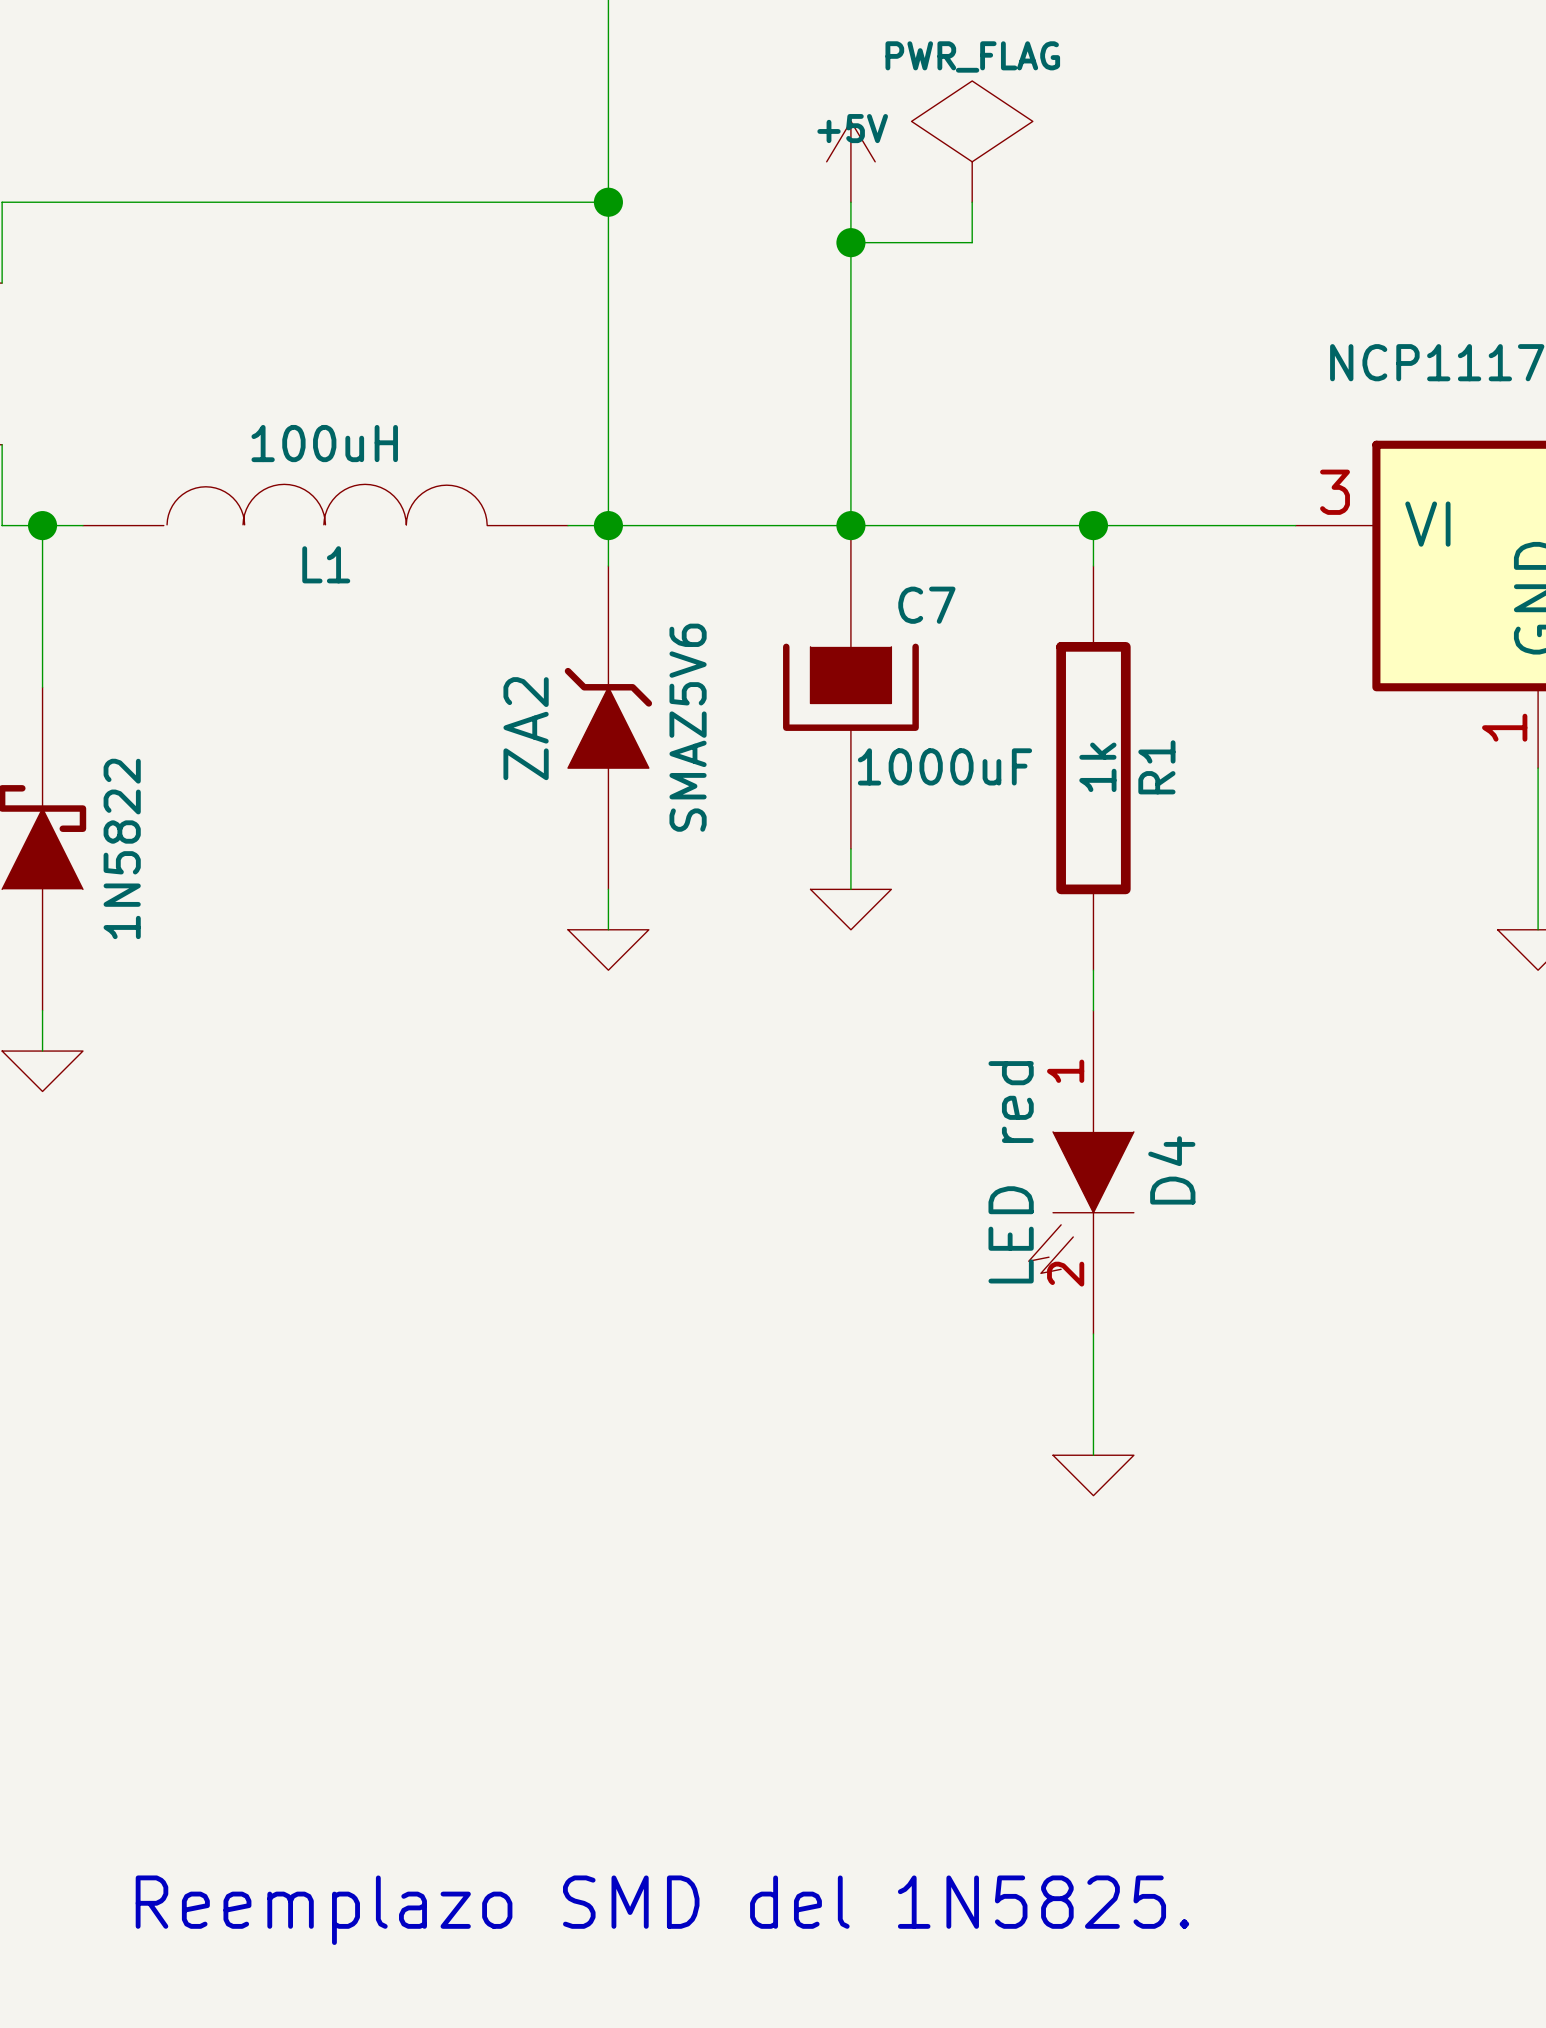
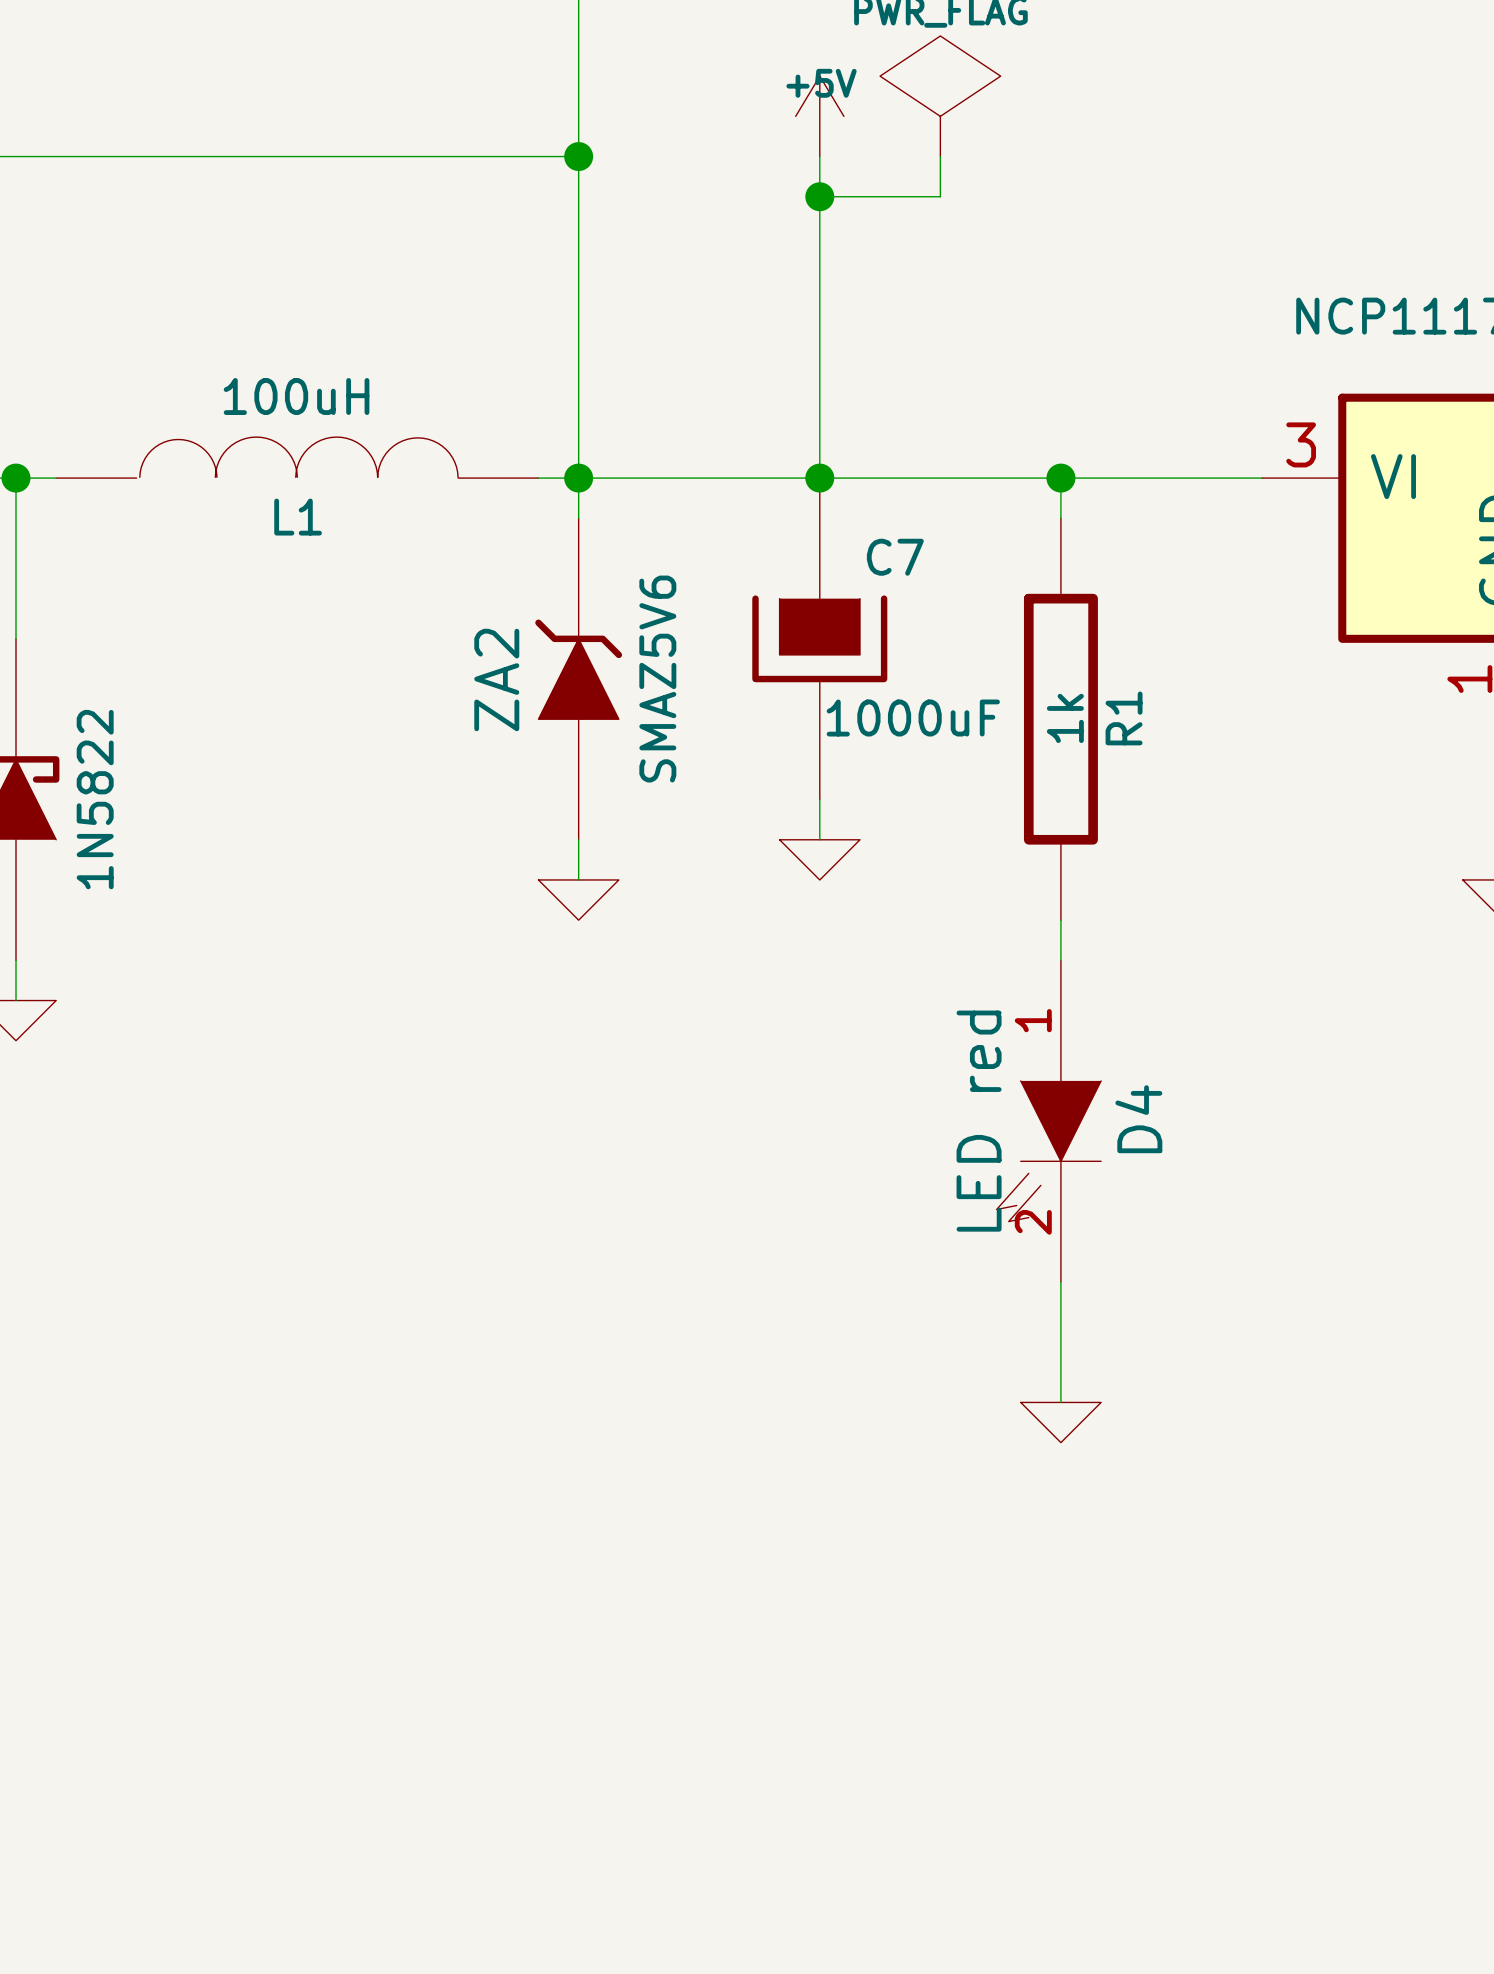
text: Reemplazo SMD del 1N5825. (662, 1910) -> none

